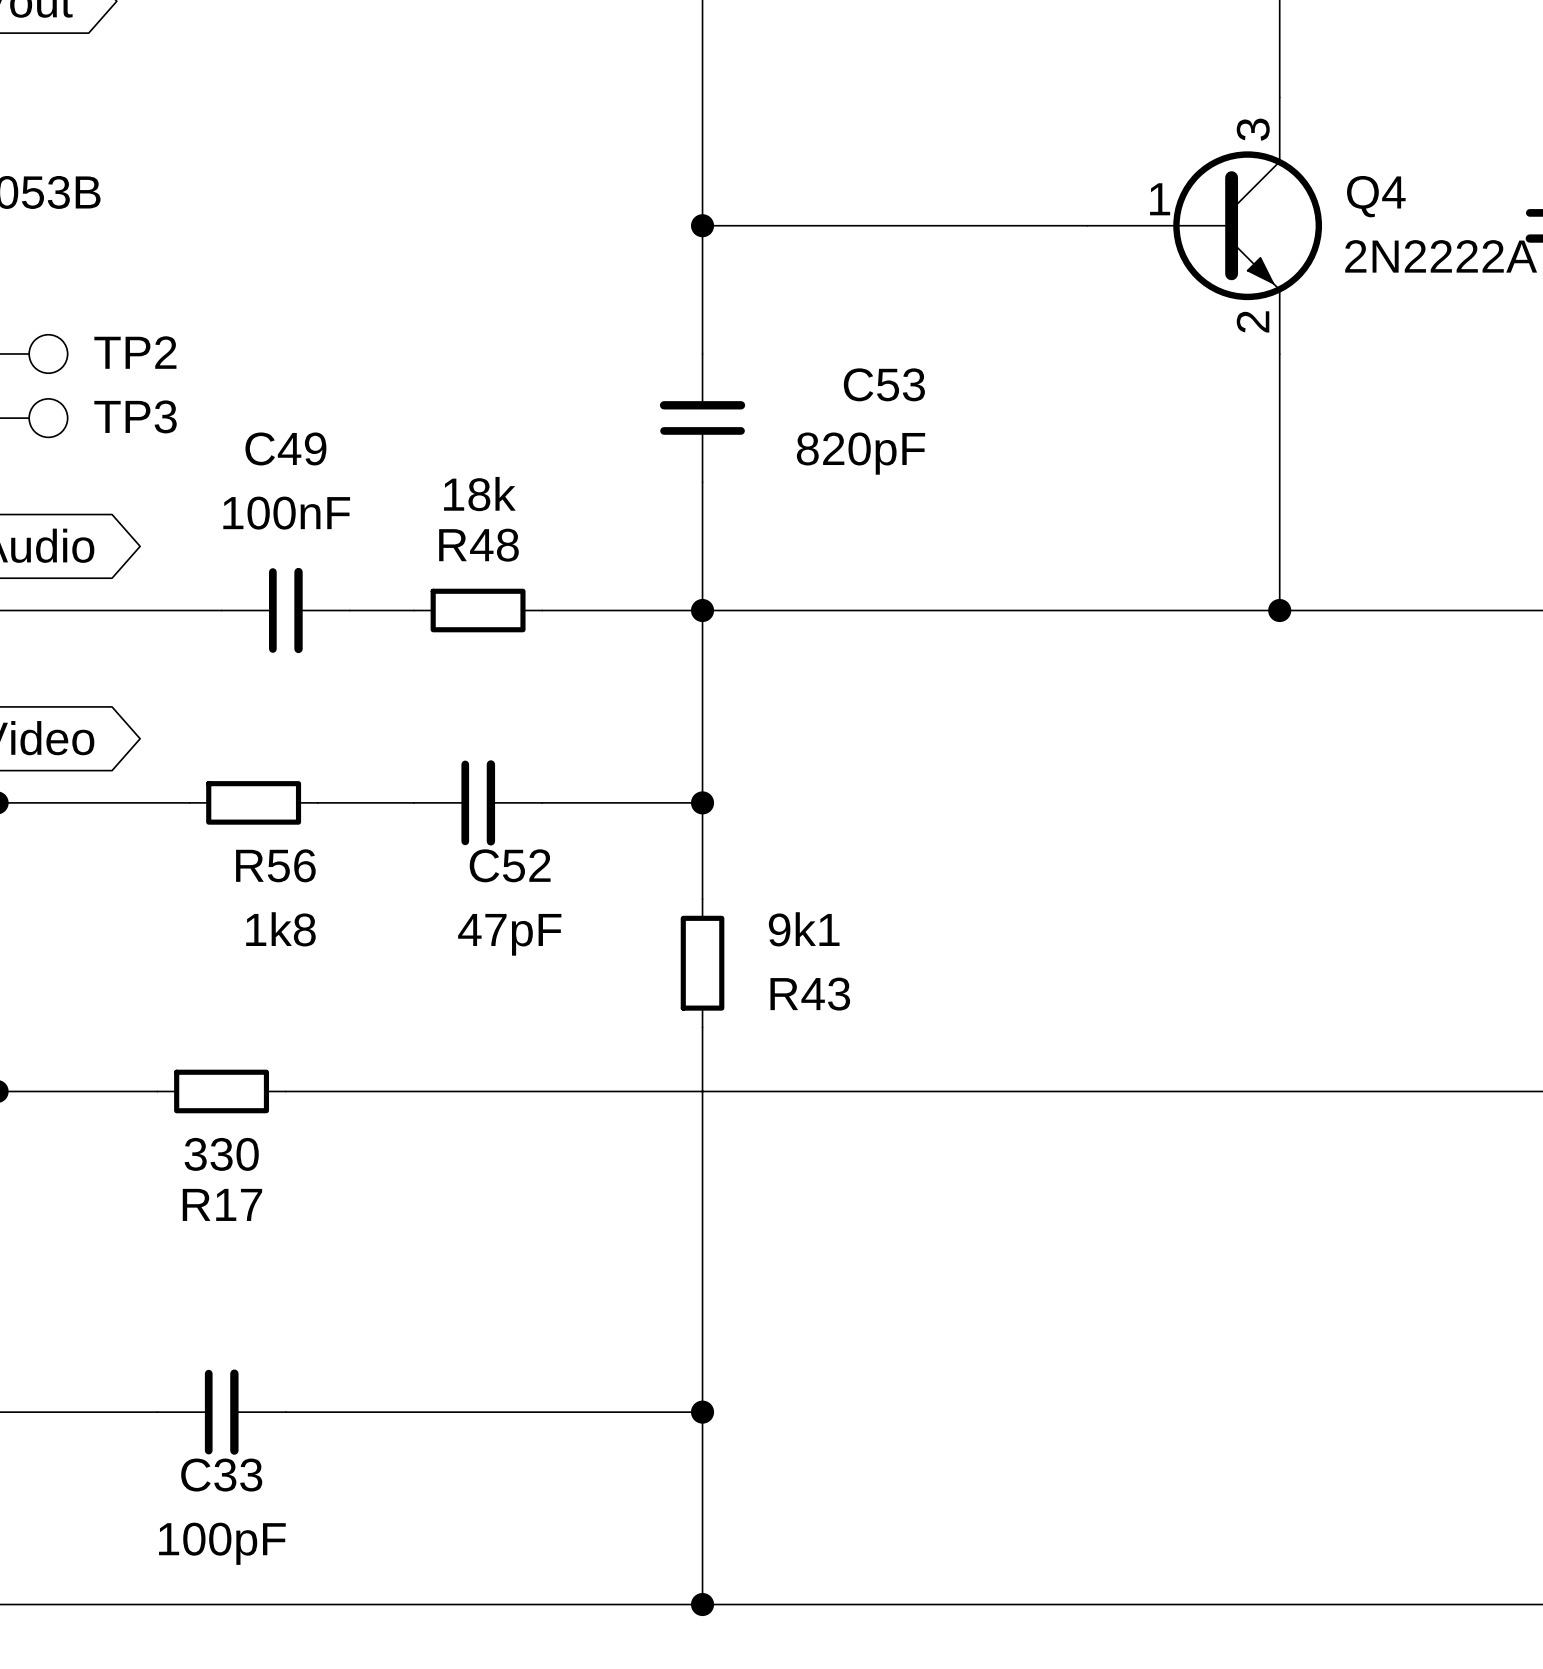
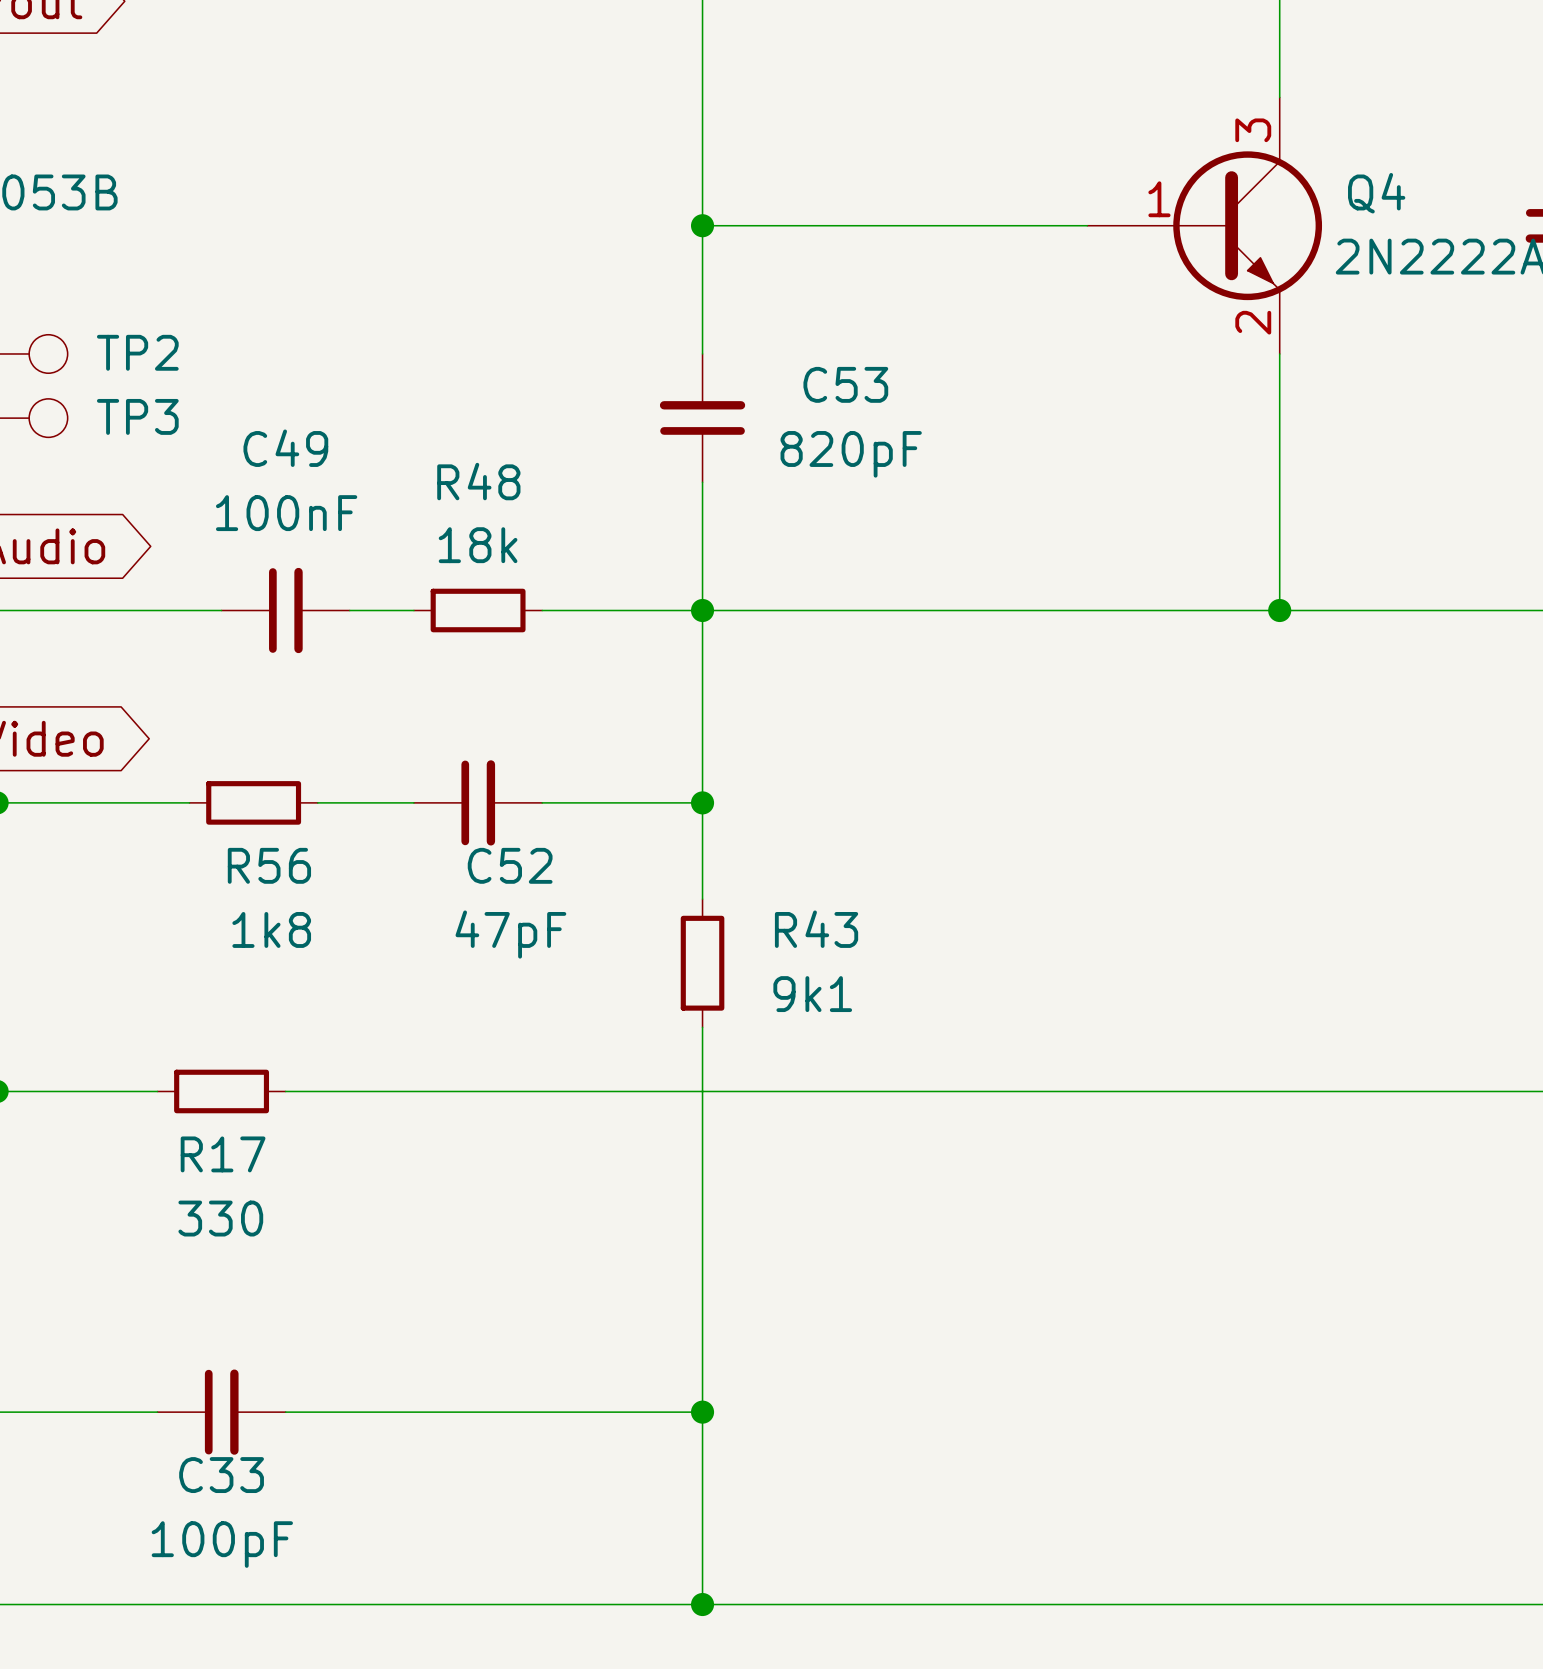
C53 name position: C53 (884, 384) -> C53 (845, 384)
R48 value position: 18k (479, 494) -> 18k (478, 545)
R48 name position: R48 (478, 545) -> R48 (478, 481)
R43 value position: 9k1 (804, 929) -> 9k1 (812, 994)
R43 name position: R43 (810, 994) -> R43 (816, 929)
R17 value position: 330 (221, 1154) -> 330 (220, 1218)
R17 name position: R17 (222, 1204) -> R17 (223, 1154)

